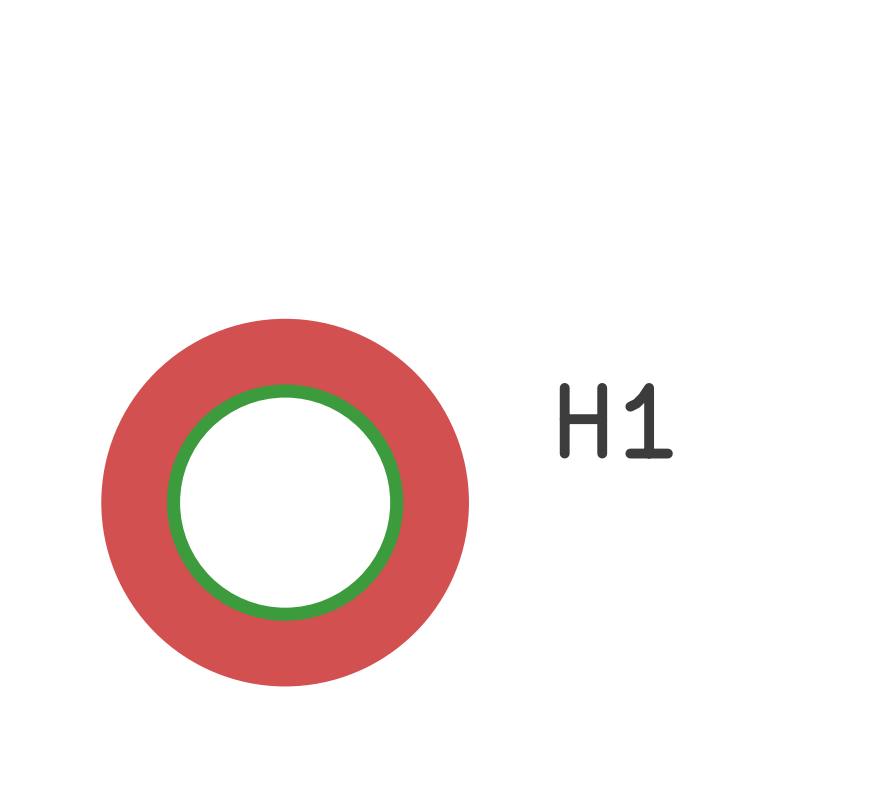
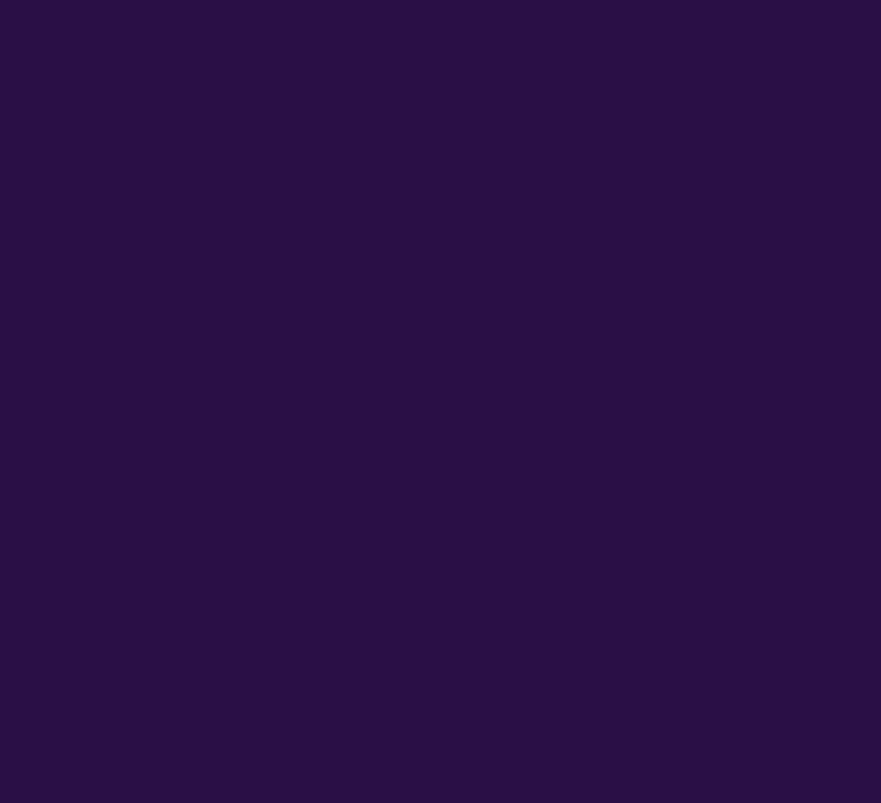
H1: (285, 502) -> none

